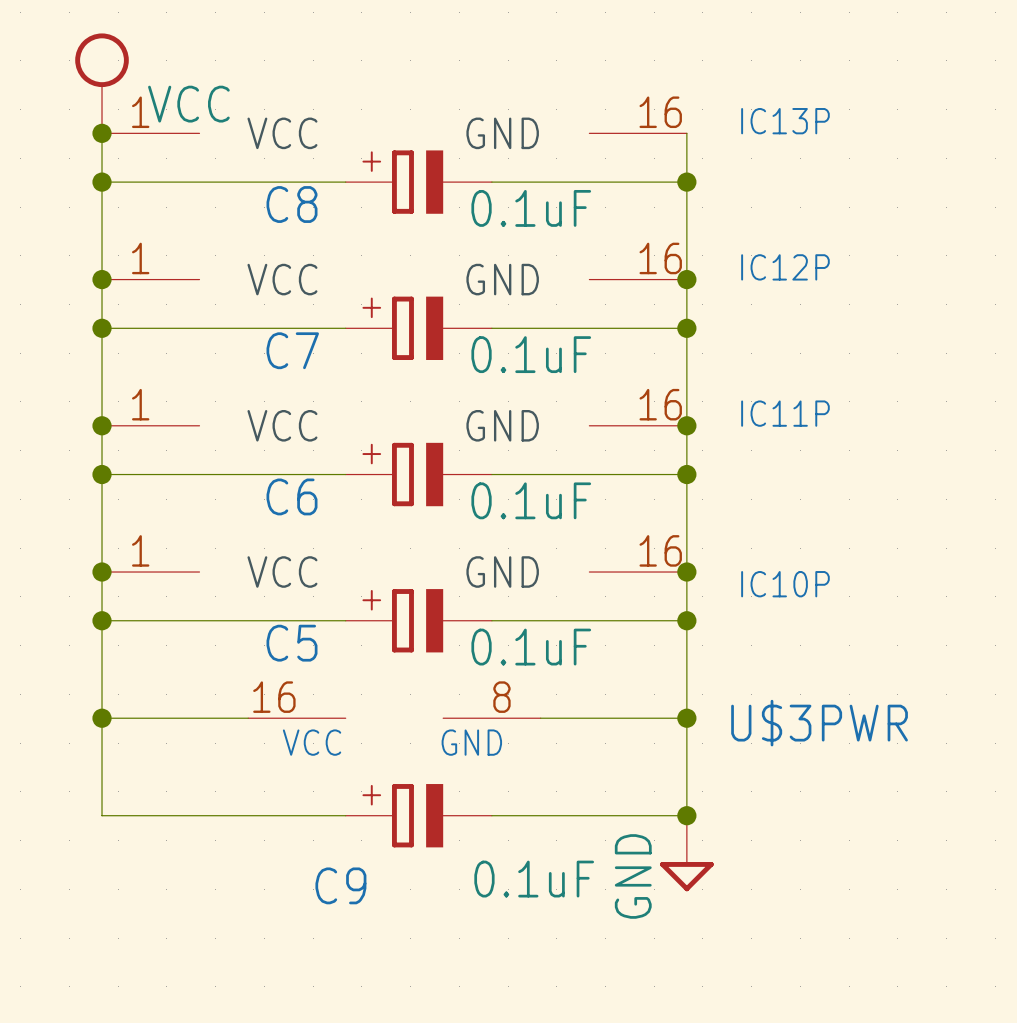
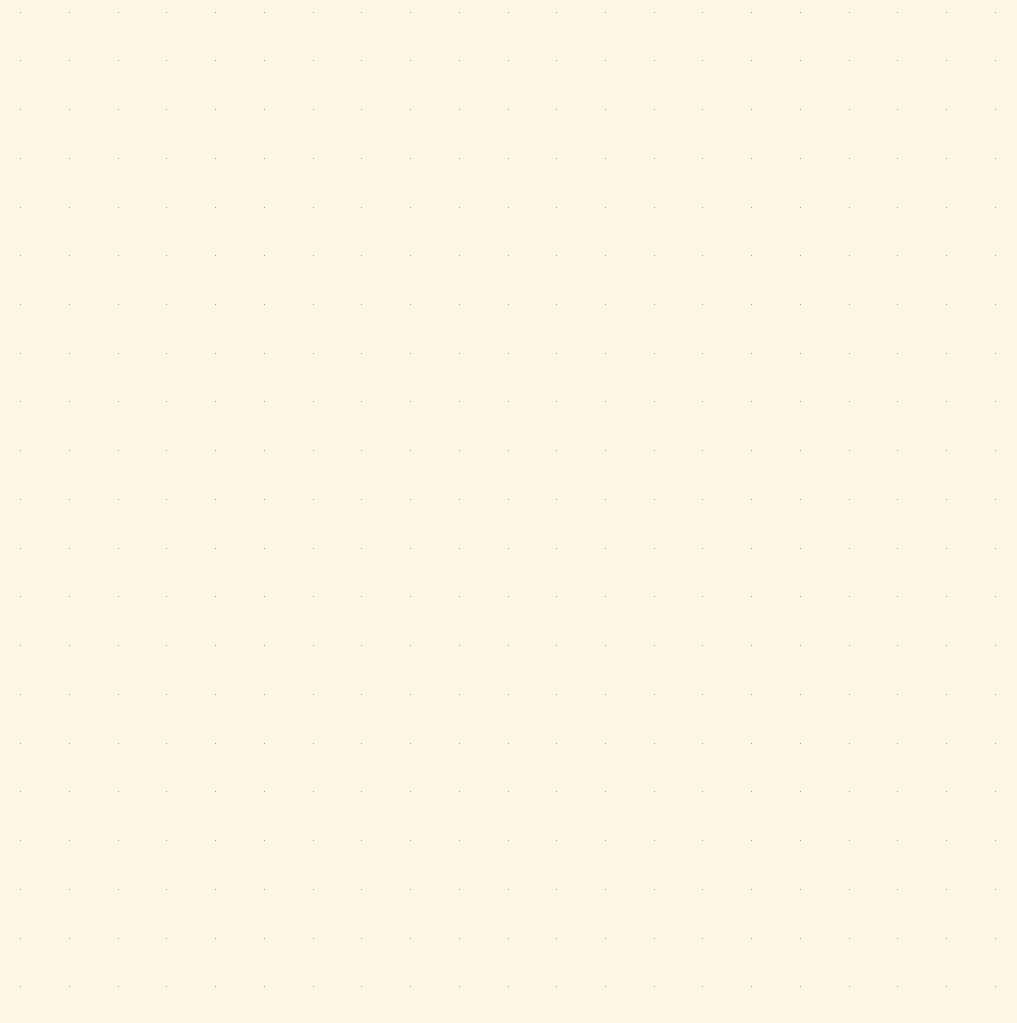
power symbol: VCC (102, 83) -> none
wire: (102, 133) (102, 815) (345, 815) -> none
junction: (102, 133) -> none
IC13P: (394, 133) -> none
wire: (686, 133) (686, 815) (491, 815) -> none
wire: (102, 182) (345, 182) -> none
junction: (102, 182) -> none
C8: 0.1uF (418, 182) -> none
wire: (491, 182) (686, 182) -> none
junction: (686, 182) -> none
junction: (102, 279) -> none
IC12P: (394, 279) -> none
junction: (686, 279) -> none
wire: (102, 328) (345, 328) -> none
junction: (102, 328) -> none
C7: 0.1uF (418, 328) -> none
wire: (491, 328) (686, 328) -> none
junction: (686, 328) -> none
junction: (102, 425) -> none
IC11P: (394, 425) -> none
junction: (686, 425) -> none
wire: (102, 474) (345, 474) -> none
junction: (102, 474) -> none
C6: 0.1uF (418, 474) -> none
wire: (491, 474) (686, 474) -> none
junction: (686, 474) -> none
junction: (102, 572) -> none
IC10P: (394, 572) -> none
junction: (686, 572) -> none
wire: (102, 620) (345, 620) -> none
junction: (102, 620) -> none
C5: 0.1uF (418, 620) -> none
wire: (491, 620) (686, 620) -> none
junction: (686, 620) -> none
wire: (102, 718) (248, 718) -> none
junction: (102, 718) -> none
U$3PWR: (394, 718) -> none
wire: (540, 718) (686, 718) -> none
junction: (686, 718) -> none
C9: 0.1uF (418, 815) -> none
junction: (686, 815) -> none
power symbol: GND (686, 853) -> none

